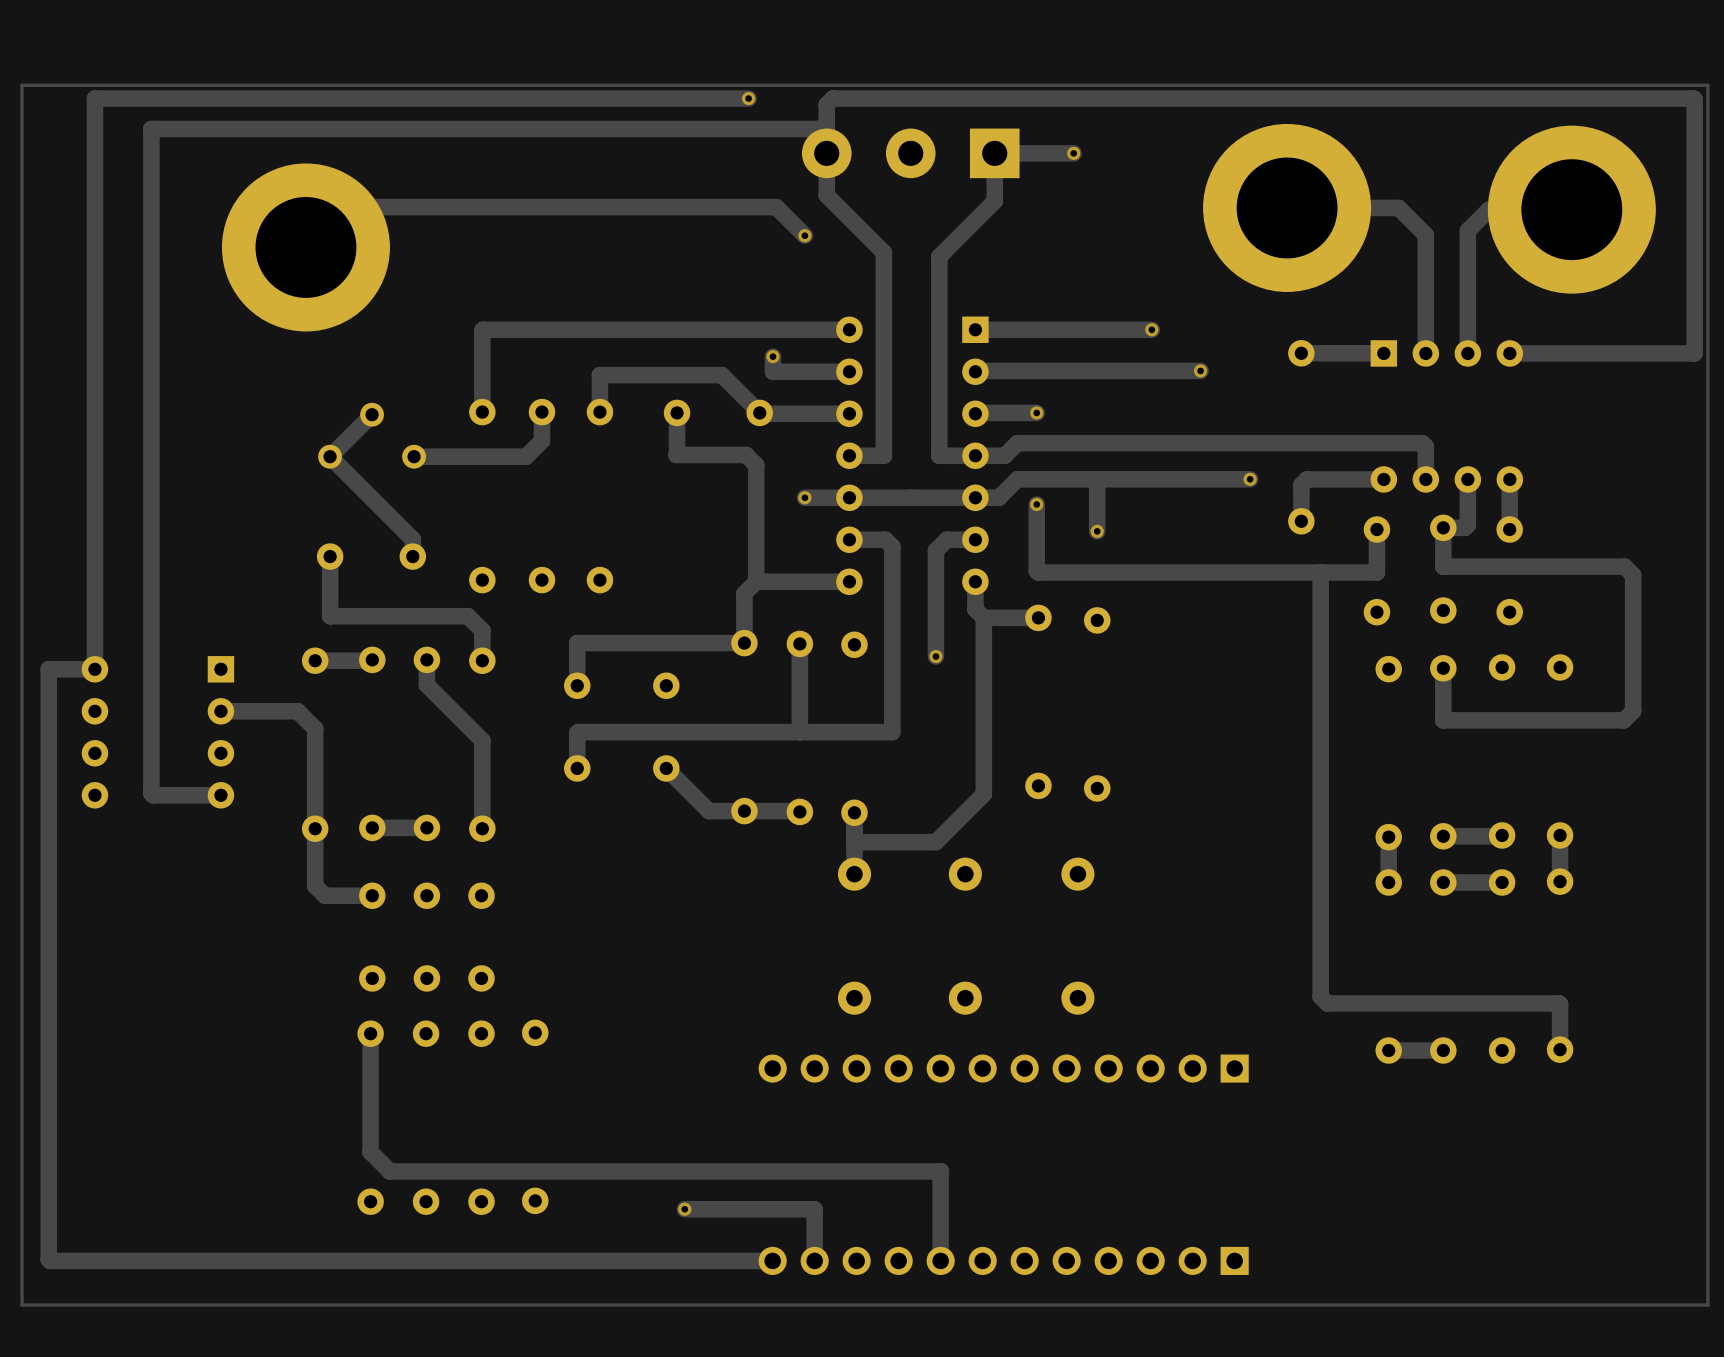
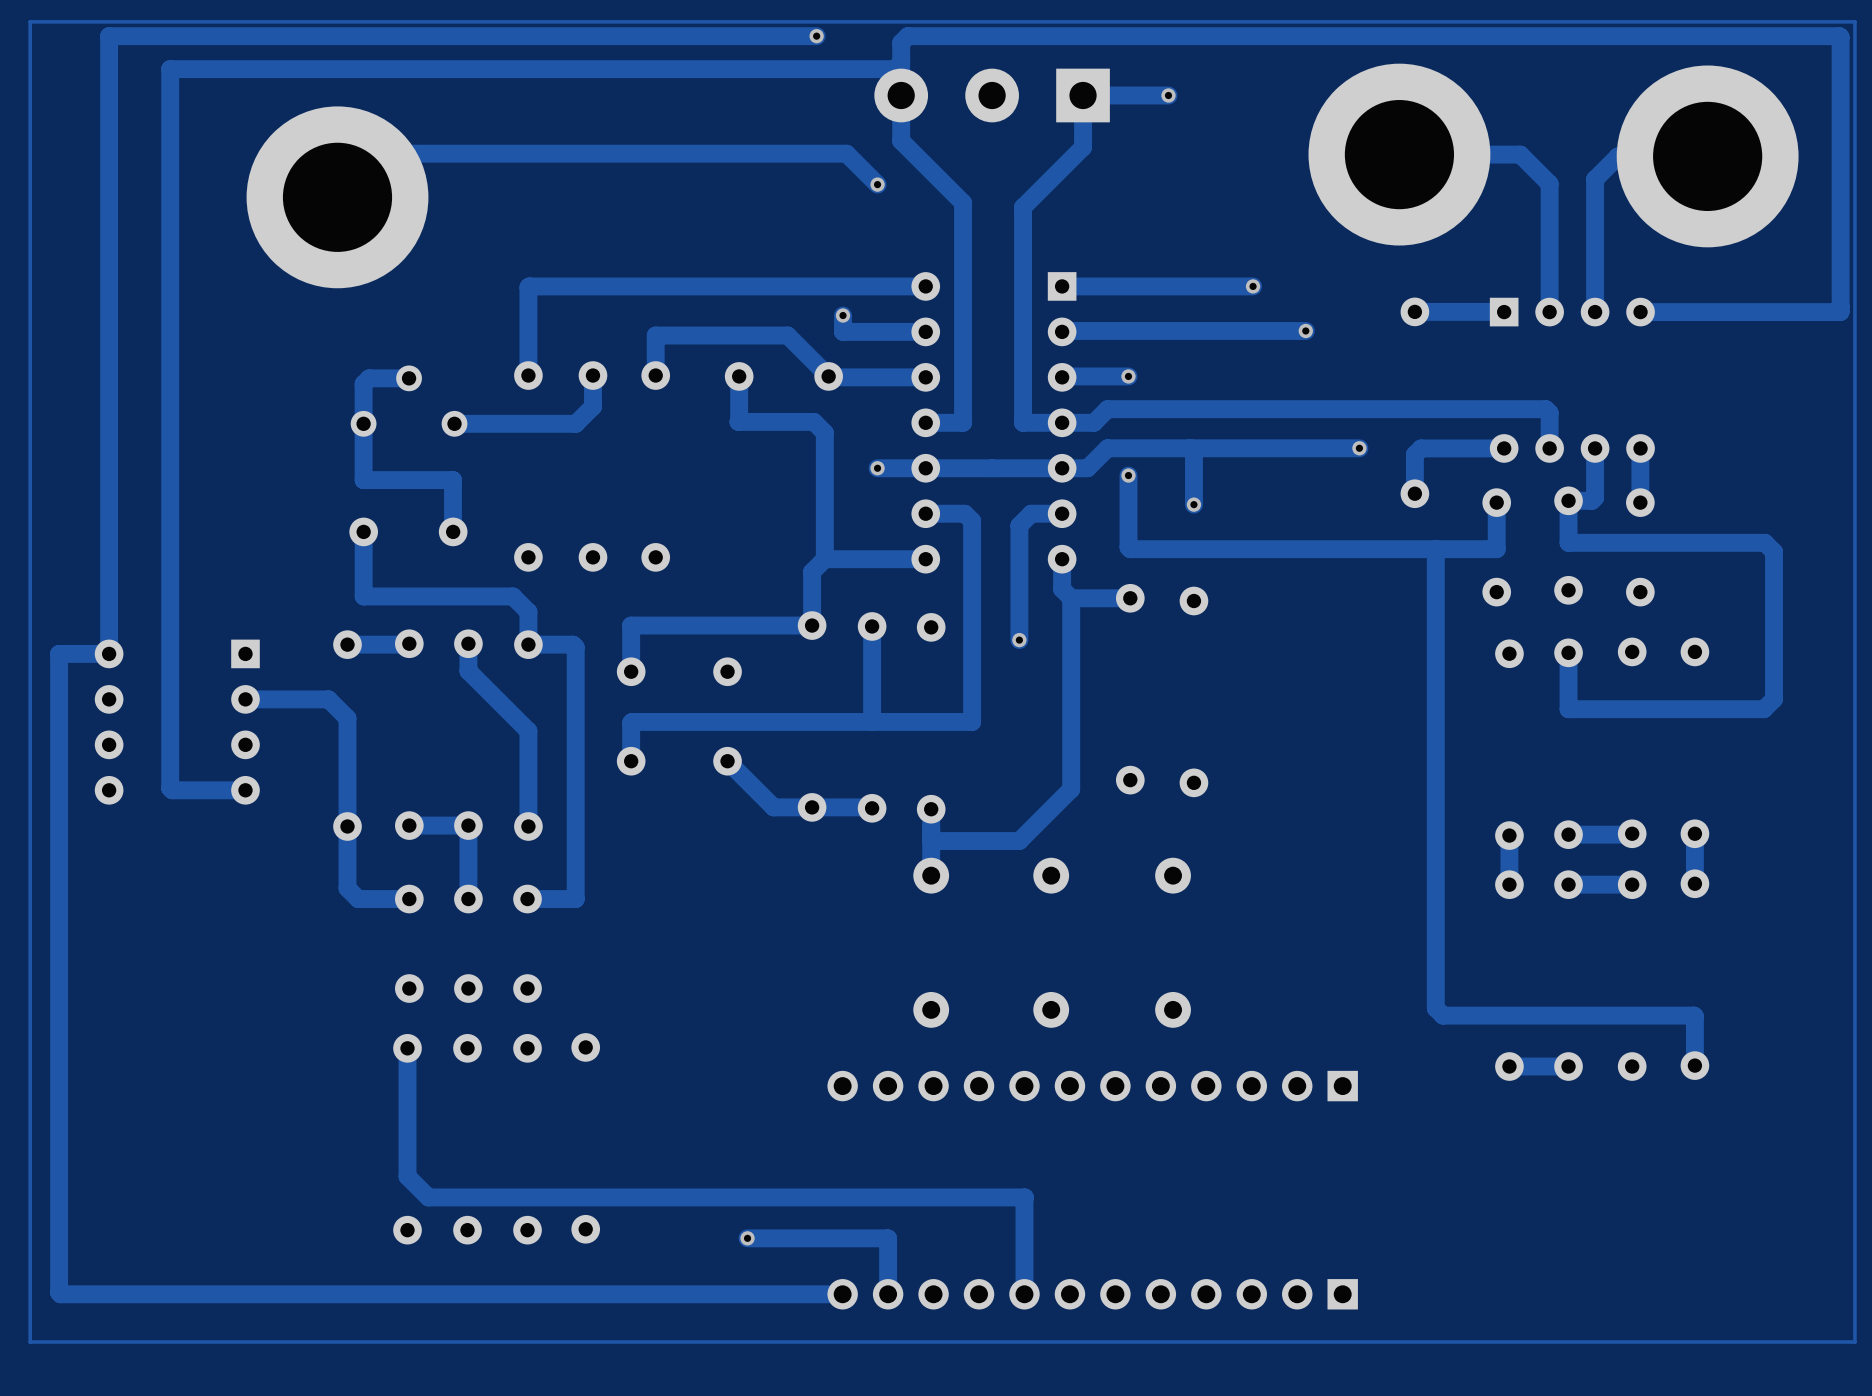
track: (372, 414) (330, 456) (412, 539) (412, 556) -> (409, 378) (369, 378) (363, 383) (363, 480) (452, 480) (452, 531)
track: none -> (528, 644) (572, 644) (575, 647) (575, 899) (527, 899)
track: none -> (468, 825) (468, 899)

